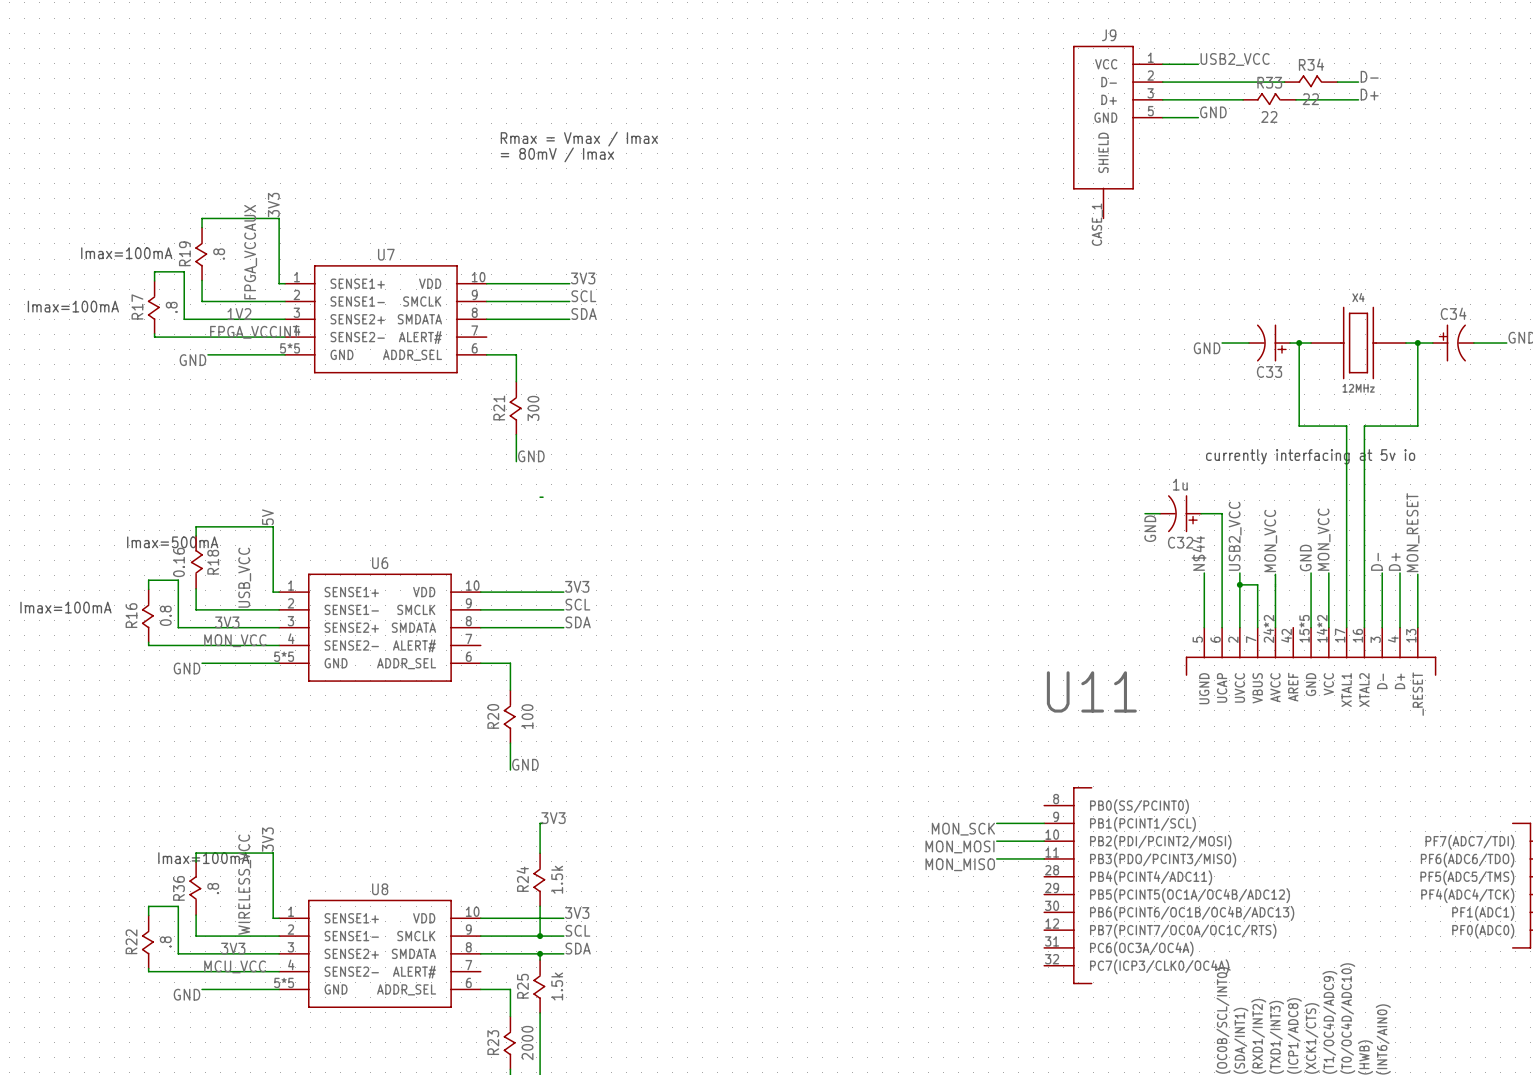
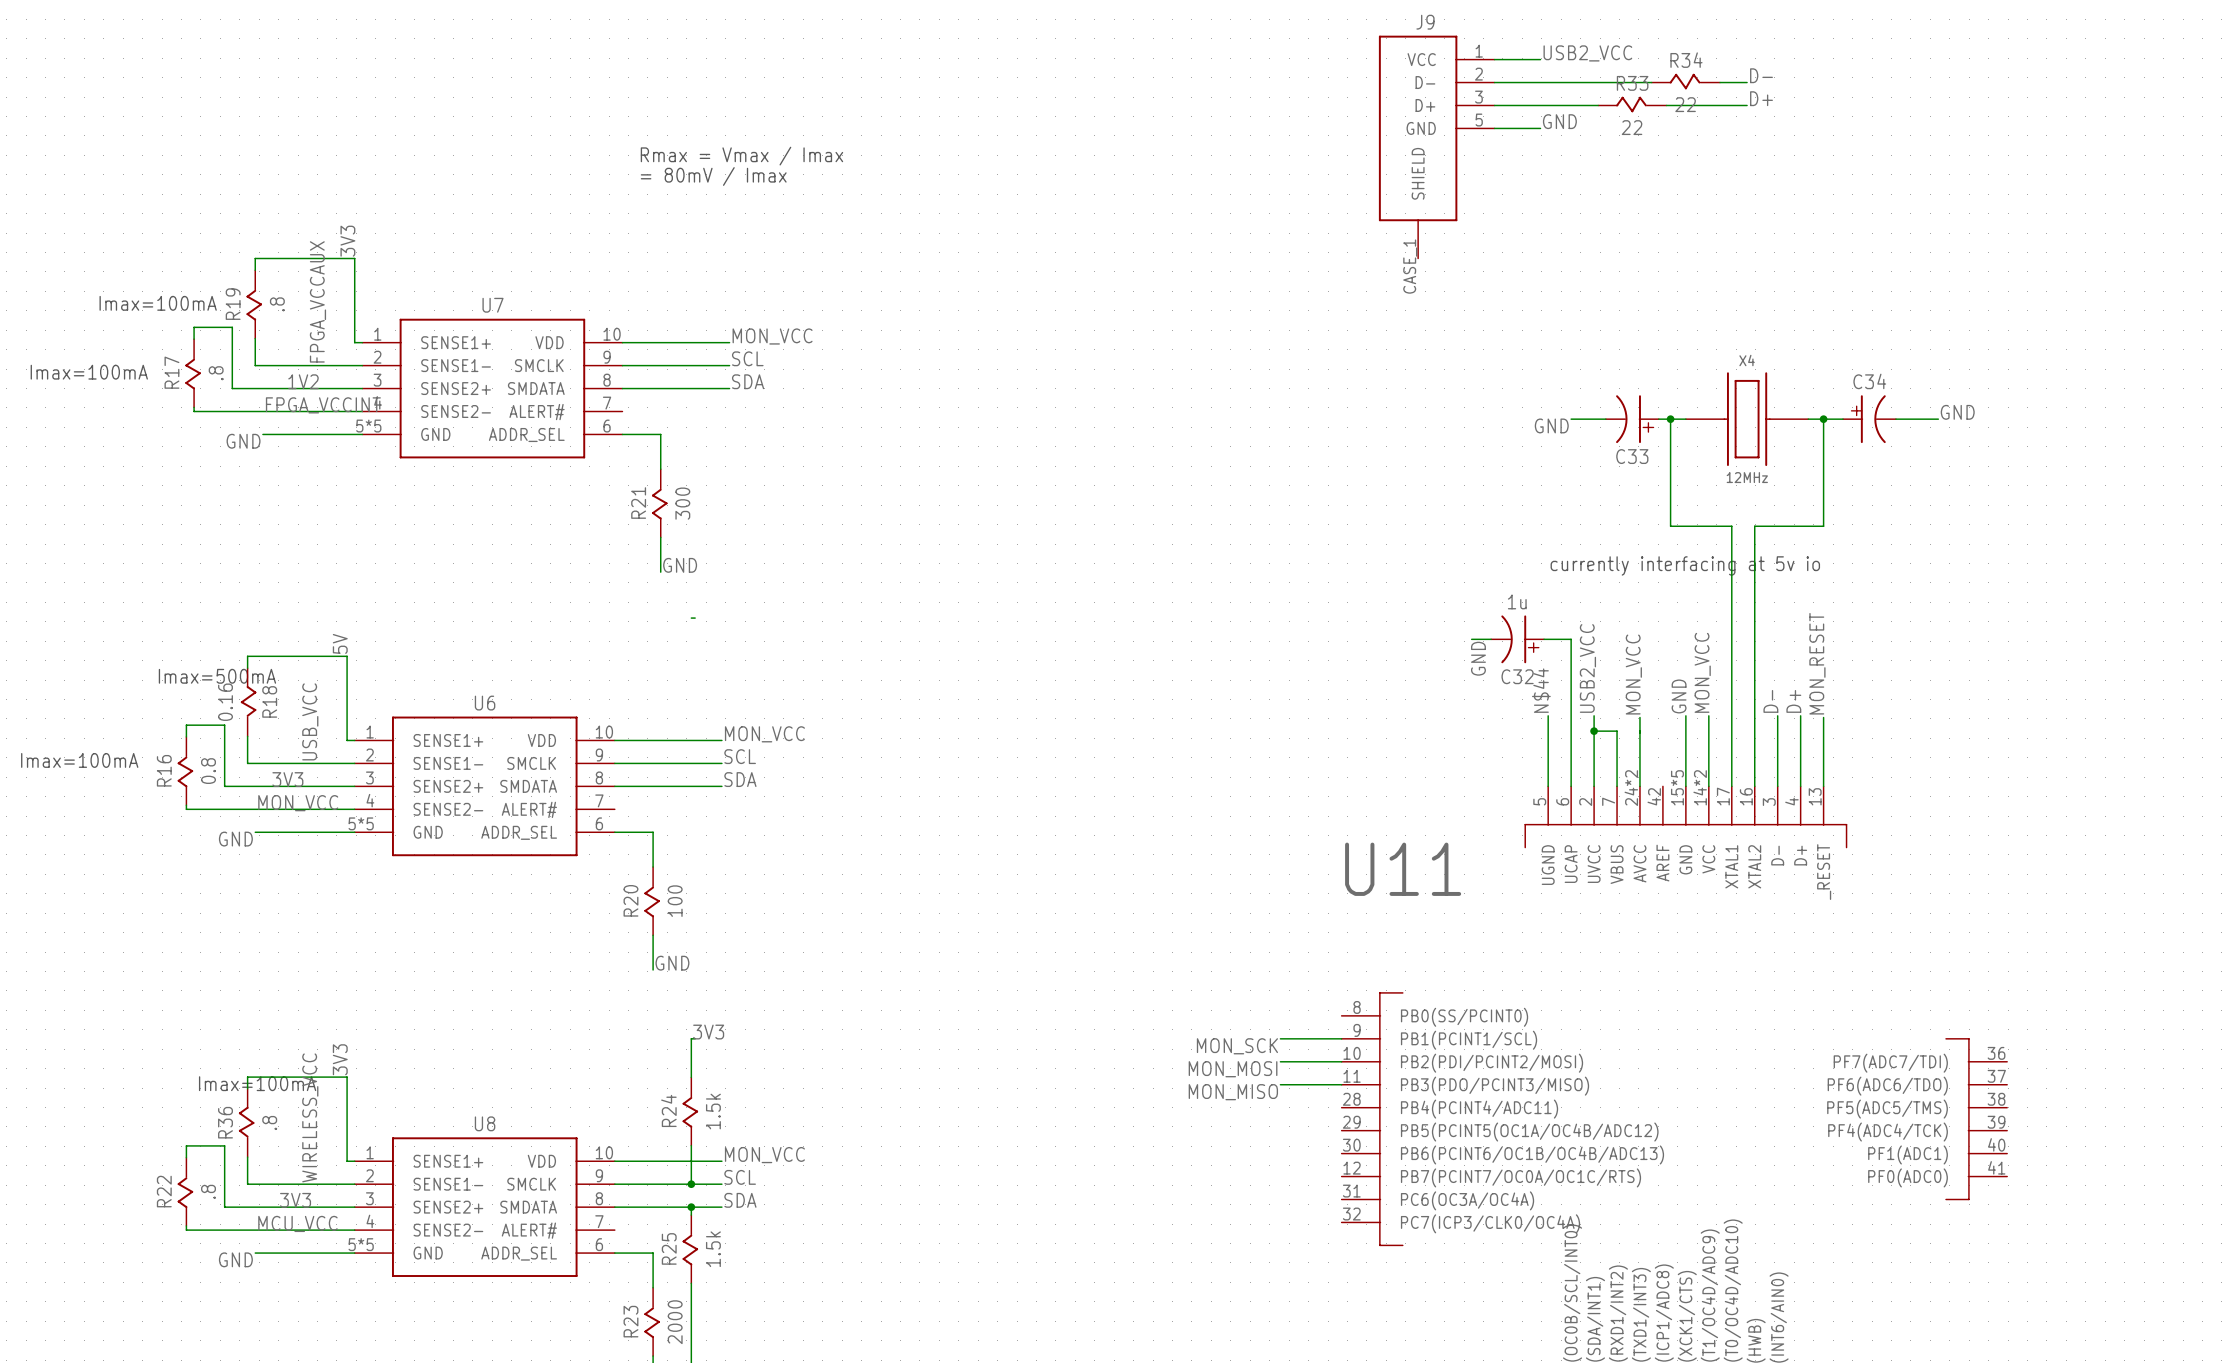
label: 3V3 (583, 278) -> MON_VCC (772, 336)
label: 3V3 (577, 586) -> MON_VCC (764, 734)
label: 3V3 (577, 913) -> MON_VCC (764, 1155)

